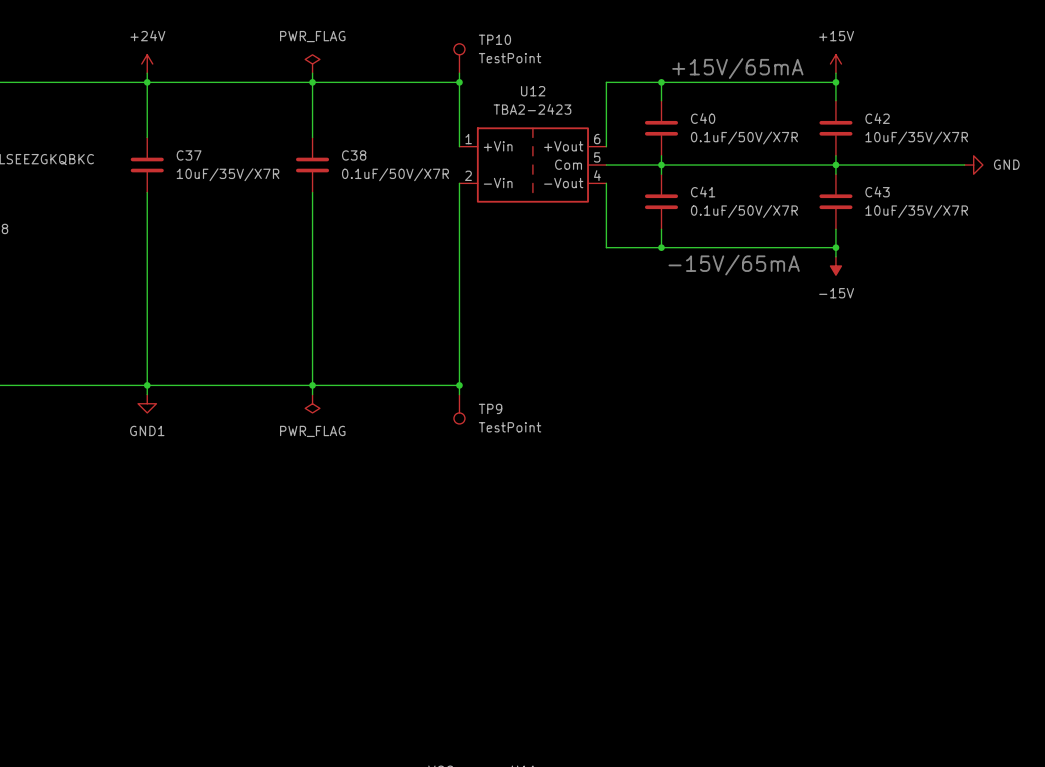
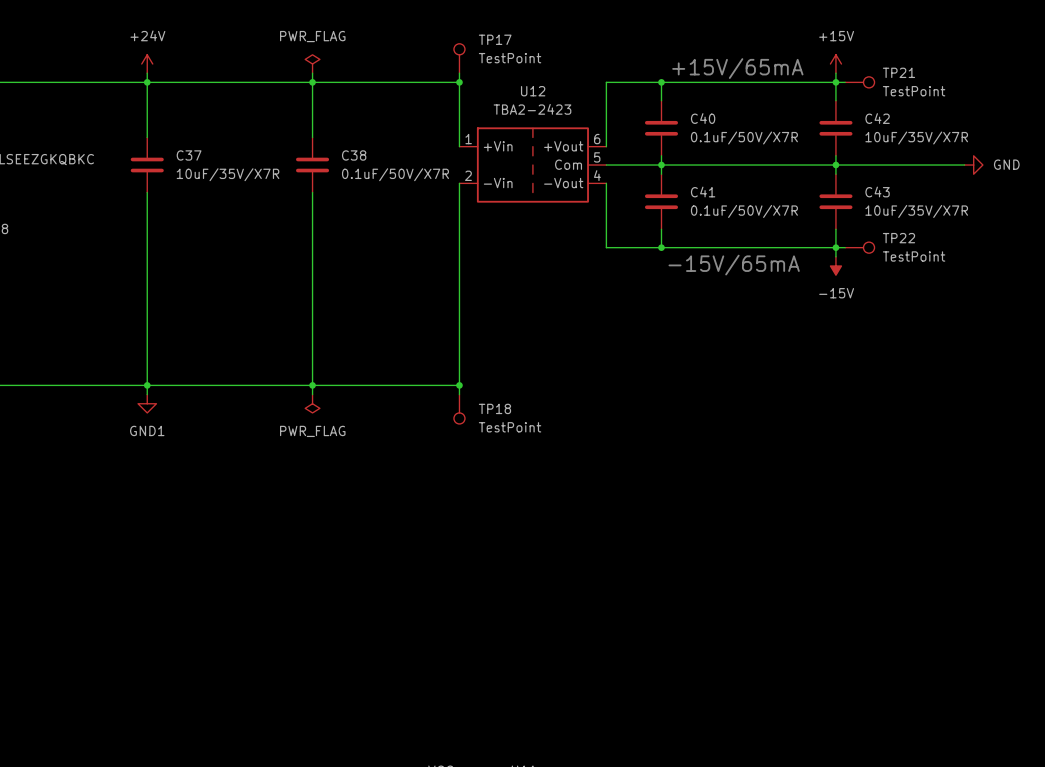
TP10 name: TP10 (494, 39) -> TP17 (495, 39)
wire: none -> (835, 82) (845, 82)
TP21: none -> TestPoint (859, 82)
wire: none -> (835, 247) (845, 247)
TP22: none -> TestPoint (859, 247)
TP9 name: TP9 (490, 408) -> TP18 (494, 408)

